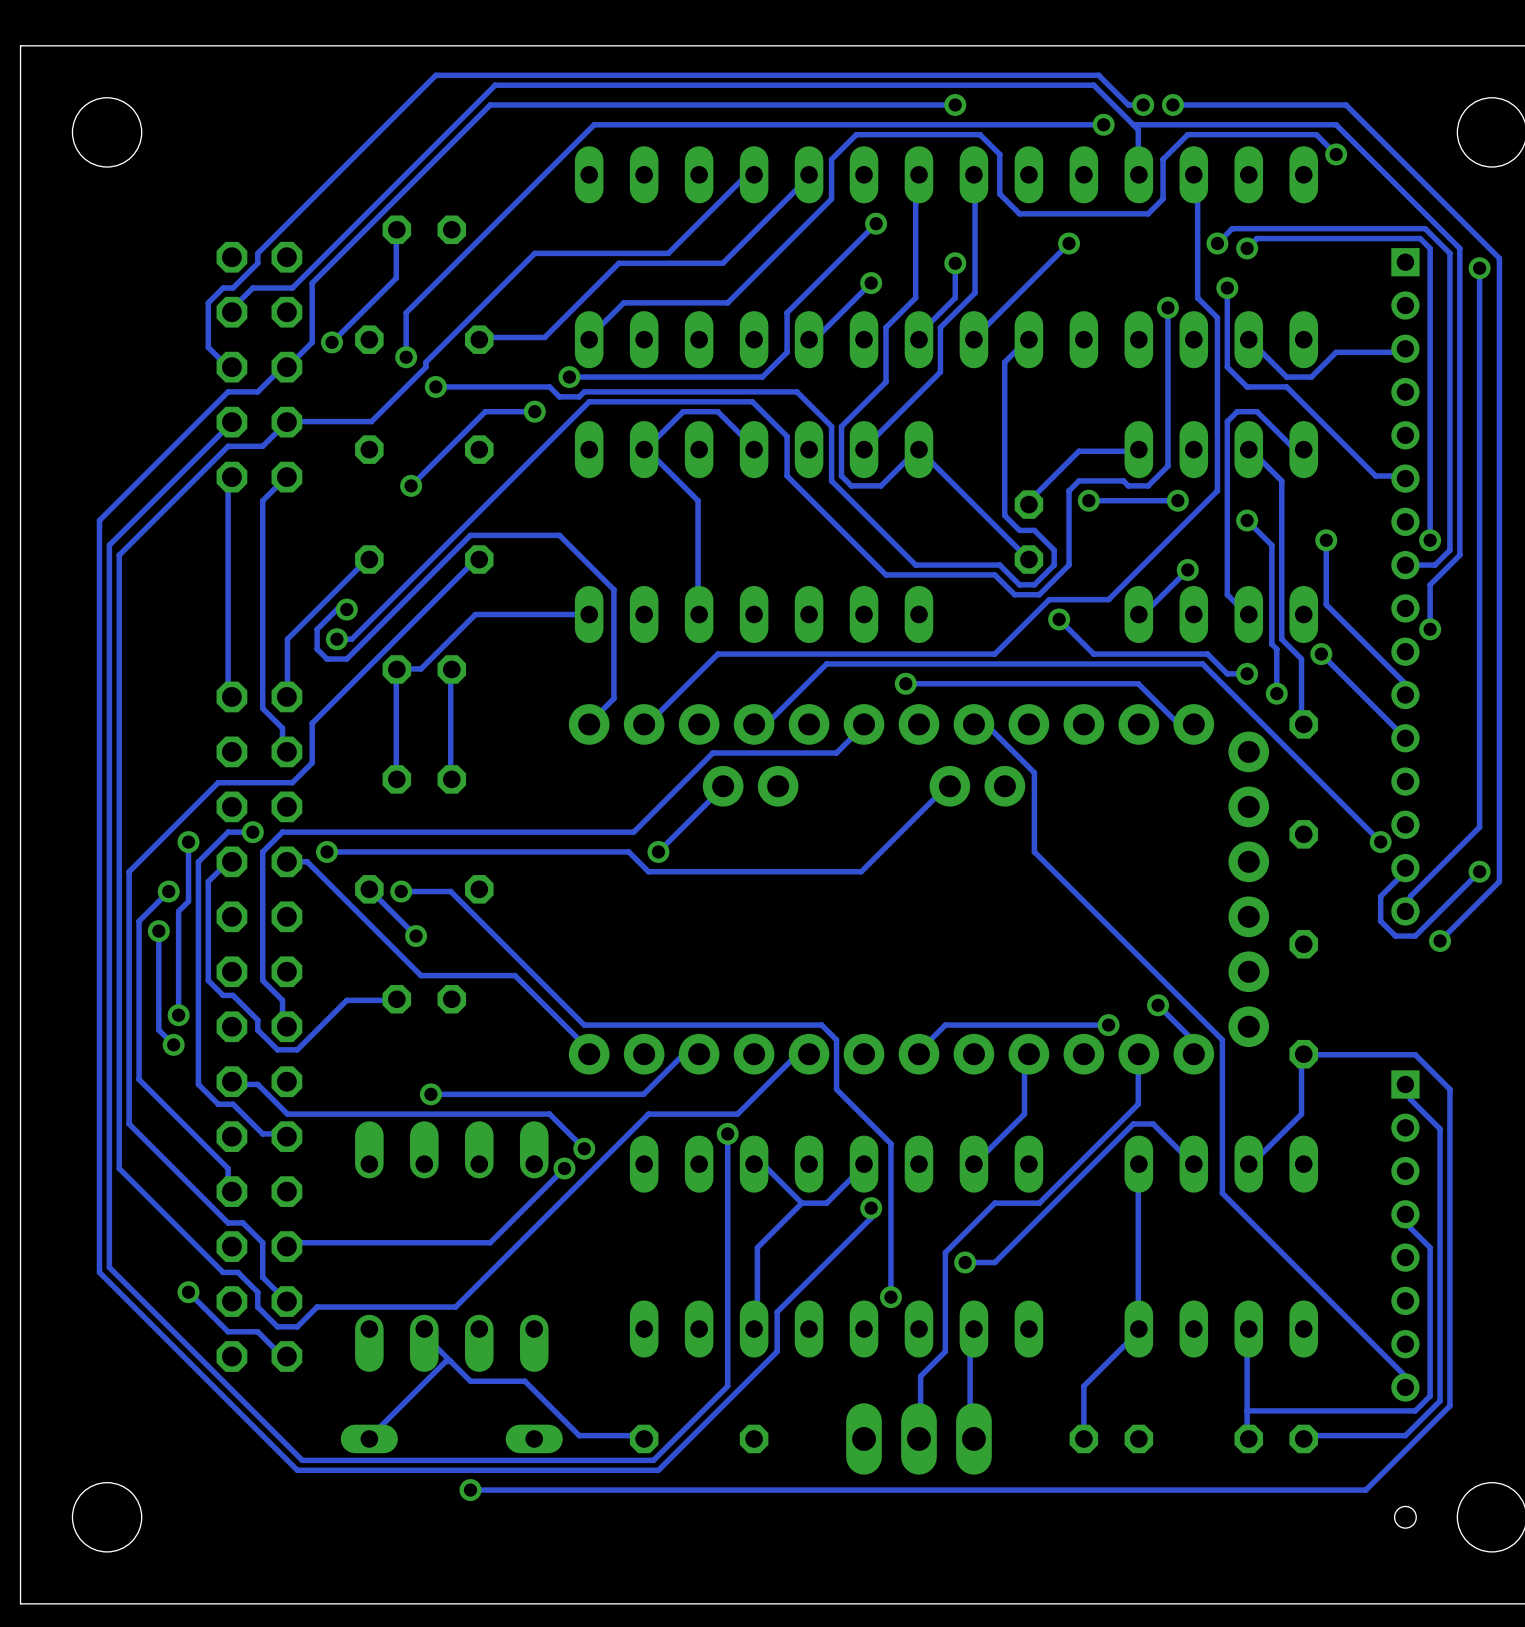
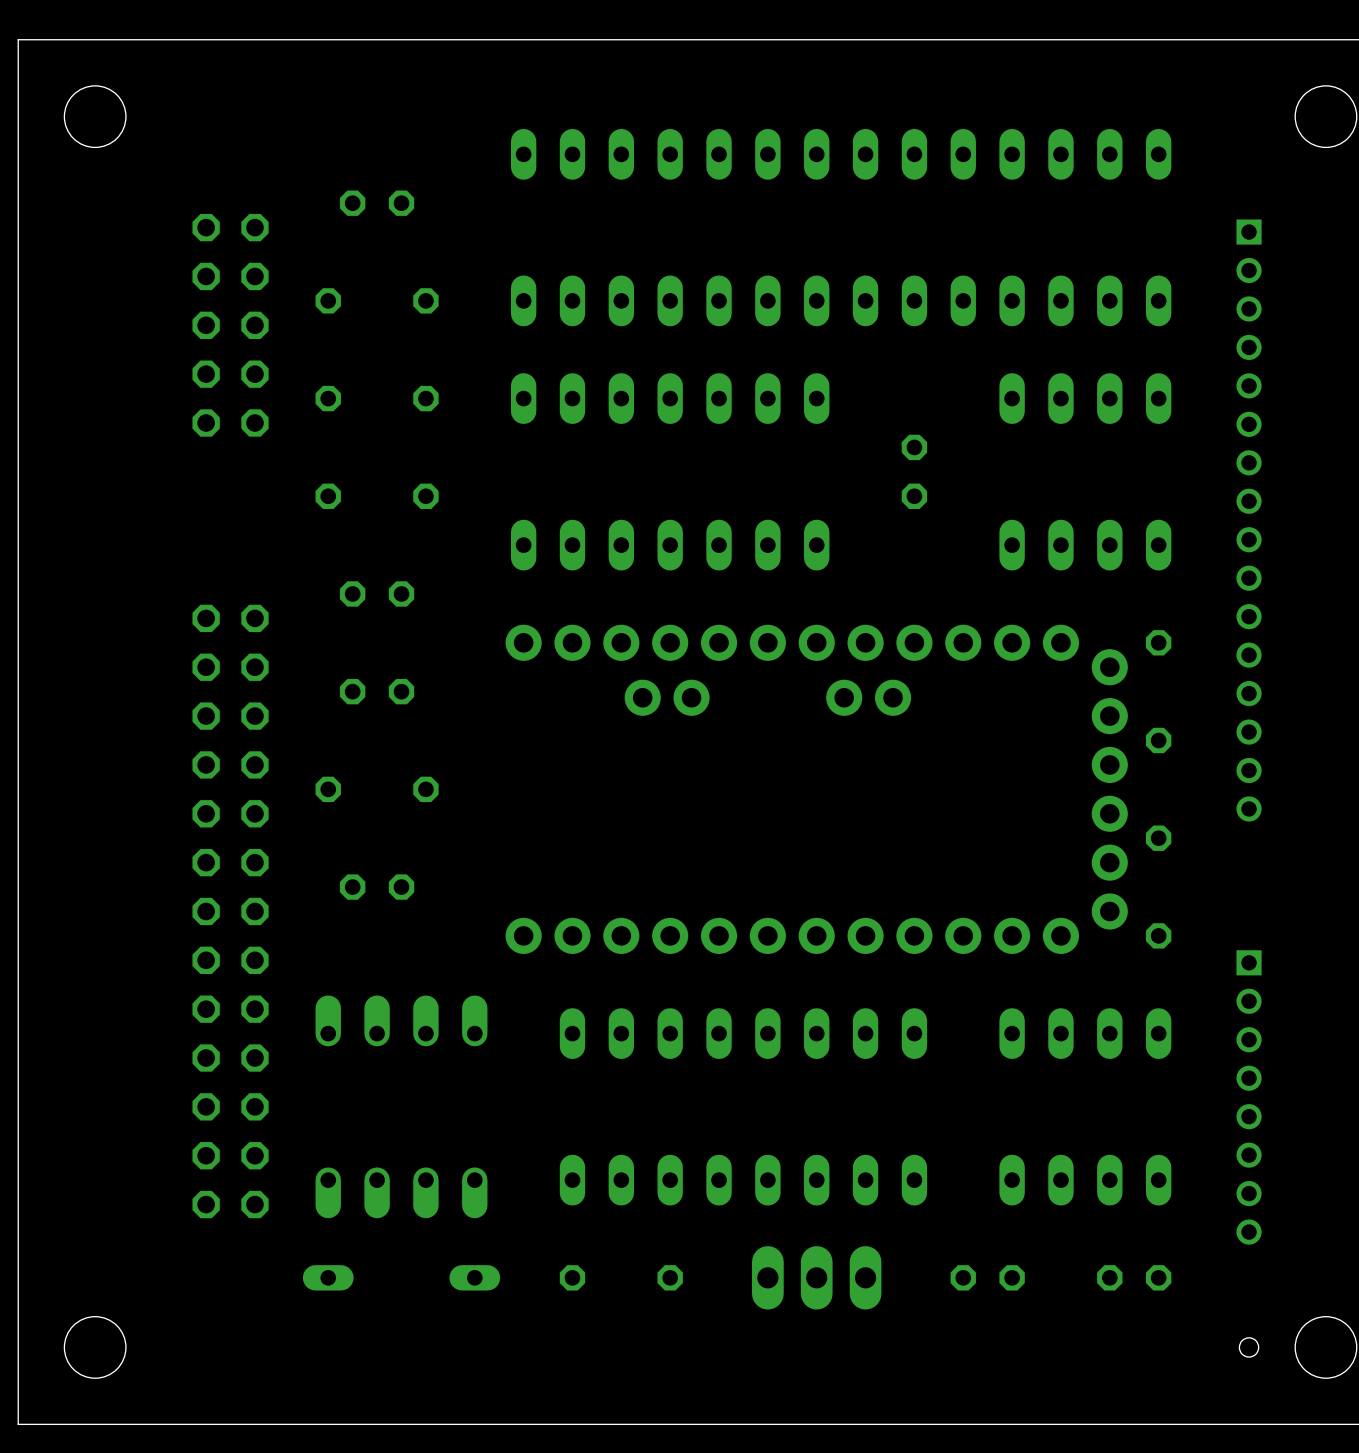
track: (955, 104) (490, 104) (312, 283) (312, 342) (287, 367) (282, 367) (257, 391) (228, 391) (99, 520) (99, 1272) (297, 1470) (658, 1470) (777, 1351) (777, 1311) (871, 1218) (871, 1208) -> none
via: (955, 104) -> none
track: (1143, 104) (1128, 104) (1098, 75) (435, 75) (257, 253) (257, 263) (233, 288) (223, 288) (208, 302) (208, 347) (228, 367) (231, 367) -> none
via: (1143, 104) -> none
track: (1172, 104) (1346, 104) (1499, 258) (1499, 881) (1440, 940) -> none
via: (1172, 104) -> none
track: (1103, 124) (594, 124) (406, 312) (406, 357) -> none
via: (1103, 124) -> none
track: (1133, 124) (1336, 124) (1459, 248) (1459, 555) (1430, 584) (1430, 629) -> none
track: (1336, 154) (1316, 134) (1187, 134) (1163, 159) (1163, 198) (1148, 213) (1019, 213) (999, 194) (999, 154) (980, 134) (856, 134) (831, 159) (831, 198) (727, 302) (623, 302) (589, 337) (589, 339) -> none
via: (1336, 154) -> none
track: (754, 174) (752, 179) (742, 179) (668, 253) (534, 253) (425, 362) (425, 367) (371, 421) (287, 421) (262, 446) (228, 446) (119, 555) (119, 1168) (223, 1272) (237, 1272) (257, 1292) (257, 1307) (277, 1326) (297, 1326) (317, 1307) (455, 1307) (648, 1114) (737, 1114) (796, 1054) (809, 1054) -> none
track: (809, 174) (722, 263) (618, 263) (544, 337) (480, 337) (479, 339) -> none
track: (918, 174) (915, 179) (915, 297) (886, 327) (886, 382) (841, 426) (841, 475) (851, 485) (881, 485) (918, 449) (1028, 559) -> none
track: (973, 174) (975, 292) (940, 327) (940, 372) (864, 449) -> none
track: (1138, 174) (1138, 129) (1093, 85) (495, 85) (292, 288) (252, 288) (233, 307) (231, 312) -> none
track: (1193, 174) (1197, 179) (1197, 297) (1217, 317) (1217, 490) (1108, 599) (1049, 599) (994, 654) (717, 654) (648, 723) (644, 724) -> none
track: (876, 223) (787, 312) (787, 352) (762, 377) (569, 377) -> none
via: (876, 223) -> none
track: (396, 229) (396, 278) (331, 342) -> none
track: (1069, 243) (973, 339) -> none
via: (1069, 243) -> none
track: (1217, 243) (1232, 228) (1425, 228) (1449, 253) (1449, 550) (1435, 565) (1405, 565) -> none
via: (1217, 243) -> none
track: (1247, 248) (1257, 238) (1420, 238) (1430, 248) (1430, 540) -> none
via: (1247, 248) -> none
track: (955, 263) (955, 297) (915, 337) (918, 339) -> none
via: (955, 263) -> none
track: (1479, 268) (1479, 827) (1410, 896) (1410, 911) (1405, 911) -> none
via: (1479, 268) -> none
track: (871, 283) (811, 342) (809, 339) -> none
via: (871, 283) -> none
track: (1227, 288) (1227, 367) (1247, 386) (1286, 386) (1375, 475) (1405, 475) (1405, 478) -> none
via: (1227, 288) -> none
track: (1167, 307) (1167, 466) (1148, 485) (1128, 485) (1123, 480) (1078, 480) (1069, 490) (1069, 565) (1039, 594) (1014, 594) (994, 574) (886, 574) (787, 475) (787, 436) (752, 401) (589, 401) (351, 639) (336, 639) -> none
via: (1167, 307) -> none
track: (1028, 339) (1004, 362) (1004, 515) (1019, 530) (1034, 530) (1054, 550) (1054, 565) (1034, 584) (1019, 584) (999, 565) (915, 565) (831, 480) (831, 426) (796, 391) (584, 391) (579, 396) (559, 396) (549, 386) (435, 386) -> none
track: (1248, 339) (1286, 377) (1311, 377) (1336, 352) (1405, 352) (1405, 348) -> none
via: (331, 342) -> none
via: (406, 357) -> none
via: (569, 377) -> none
via: (435, 386) -> none
track: (534, 411) (485, 411) (411, 485) -> none
via: (534, 411) -> none
track: (231, 422) (109, 545) (109, 1267) (302, 1460) (653, 1460) (727, 1386) (727, 1133) -> none
track: (754, 449) (717, 411) (683, 411) (644, 449) (648, 451) (698, 500) (699, 614) -> none
track: (1138, 449) (1138, 451) (1078, 451) (1029, 500) (1028, 504) -> none
track: (1248, 449) (1281, 480) (1281, 639) (1301, 659) (1301, 723) (1303, 724) -> none
track: (1303, 449) (1301, 446) (1291, 446) (1257, 411) (1237, 411) (1227, 421) (1227, 594) (1248, 614) -> none
track: (231, 477) (228, 480) (228, 693) (231, 696) -> none
track: (286, 477) (262, 500) (262, 708) (282, 728) (282, 748) (286, 751) -> none
via: (411, 485) -> none
via: (1088, 500) -> none
track: (1177, 500) (1088, 500) -> none
via: (1177, 500) -> none
track: (1247, 520) (1271, 545) (1271, 644) (1276, 649) (1276, 693) -> none
via: (1247, 520) -> none
track: (1326, 540) (1326, 604) (1405, 683) (1405, 695) -> none
via: (1326, 540) -> none
via: (1430, 540) -> none
track: (369, 559) (366, 560) (287, 639) (286, 696) -> none
track: (479, 559) (475, 560) (312, 723) (312, 762) (292, 782) (218, 782) (129, 871) (129, 1124) (228, 1222) (242, 1222) (262, 1242) (262, 1277) (286, 1301) -> none
track: (1187, 569) (1143, 614) (1138, 614) -> none
via: (1187, 569) -> none
track: (346, 609) (336, 609) (317, 629) (317, 649) (327, 659) (346, 659) (470, 535) (559, 535) (613, 589) (613, 698) (589, 724) -> none
via: (346, 609) -> none
track: (589, 614) (475, 614) (421, 668) (396, 669) (396, 779) -> none
track: (1059, 619) (1093, 654) (1207, 654) (1227, 673) (1247, 673) -> none
via: (1059, 619) -> none
via: (1430, 629) -> none
via: (336, 639) -> none
track: (1321, 654) (1405, 738) -> none
via: (1321, 654) -> none
track: (451, 669) (451, 779) -> none
via: (1247, 673) -> none
track: (905, 683) (1138, 683) (1177, 723) (1193, 724) -> none
via: (905, 683) -> none
via: (1276, 693) -> none
track: (754, 724) (767, 723) (826, 663) (1202, 663) (1380, 842) -> none
track: (864, 724) (836, 753) (712, 753) (633, 832) (282, 832) (262, 851) (262, 980) (282, 1000) (282, 1025) (286, 1026) -> none
track: (973, 724) (975, 728) (989, 728) (1034, 772) (1034, 851) (1222, 1039) (1222, 1193) (1405, 1376) (1405, 1387) -> none
track: (723, 786) (658, 851) -> none
track: (949, 786) (945, 787) (861, 871) (648, 871) (628, 851) (327, 851) -> none
track: (252, 832) (228, 832) (198, 861) (198, 1084) (218, 1104) (233, 1104) (262, 1133) (282, 1133) (286, 1136) -> none
via: (252, 832) -> none
track: (188, 842) (188, 901) (178, 911) (178, 1015) -> none
via: (188, 842) -> none
via: (1380, 842) -> none
via: (327, 851) -> none
via: (658, 851) -> none
track: (231, 861) (228, 861) (208, 881) (208, 980) (223, 995) (233, 995) (257, 1020) (257, 1030) (277, 1049) (297, 1049) (346, 1000) (396, 999) -> none
track: (286, 861) (307, 861) (421, 975) (515, 975) (589, 1049) (589, 1054) -> none
track: (1405, 868) (1405, 871) (1380, 896) (1380, 921) (1395, 936) (1415, 936) (1479, 871) -> none
via: (1479, 871) -> none
track: (369, 889) (416, 936) -> none
track: (168, 891) (139, 921) (139, 1079) (228, 1168) (228, 1188) (231, 1191) -> none
via: (168, 891) -> none
track: (401, 891) (450, 891) (584, 1025) (821, 1025) (836, 1039) (836, 1089) (890, 1143) (890, 1297) -> none
via: (401, 891) -> none
track: (158, 931) (158, 1030) (173, 1044) -> none
via: (158, 931) -> none
via: (416, 936) -> none
via: (1440, 940) -> none
track: (1158, 1005) (1192, 1039) (1193, 1054) -> none
via: (1158, 1005) -> none
via: (178, 1015) -> none
track: (1108, 1025) (945, 1025) (920, 1049) (918, 1054) -> none
via: (1108, 1025) -> none
via: (173, 1044) -> none
track: (699, 1054) (683, 1054) (643, 1094) (430, 1094) -> none
track: (1028, 1054) (1024, 1054) (1024, 1114) (973, 1164) -> none
track: (1138, 1054) (1138, 1104) (1039, 1203) (994, 1203) (945, 1252) (945, 1351) (920, 1376) (920, 1435) (918, 1438) -> none
track: (231, 1081) (233, 1084) (257, 1084) (287, 1114) (549, 1114) (584, 1148) -> none
track: (1405, 1084) (1410, 1089) (1410, 1099) (1440, 1128) (1440, 1401) (1405, 1435) (1306, 1435) (1303, 1438) -> none
via: (430, 1094) -> none
via: (727, 1133) -> none
via: (584, 1148) -> none
track: (754, 1164) (757, 1168) (767, 1168) (801, 1203) -> none
track: (864, 1164) (826, 1203) (801, 1203) -> none
track: (1138, 1164) (1138, 1329) (1138, 1331) (1083, 1386) (1083, 1438) -> none
track: (1193, 1164) (1153, 1124) (1133, 1124) (994, 1262) (965, 1262) -> none
track: (1248, 1164) (1252, 1163) (1301, 1114) (1301, 1054) (1415, 1054) (1449, 1089) (1449, 1405) (1365, 1490) (470, 1490) -> none
track: (564, 1168) (490, 1242) (287, 1242) (286, 1246) -> none
via: (564, 1168) -> none
track: (801, 1203) (757, 1247) (757, 1326) (754, 1329) -> none
via: (871, 1208) -> none
track: (1405, 1214) (1410, 1218) (1410, 1227) (1430, 1247) (1430, 1396) (1415, 1410) (1247, 1410) -> none
via: (965, 1262) -> none
track: (188, 1292) (228, 1331) (257, 1331) (282, 1356) (286, 1356) -> none
via: (188, 1292) -> none
via: (890, 1297) -> none
track: (424, 1329) (421, 1331) (470, 1381) (524, 1381) (579, 1435) (643, 1435) (644, 1438) -> none
track: (973, 1329) (970, 1331) (970, 1435) (973, 1438) -> none
track: (1248, 1329) (1247, 1331) (1247, 1435) (1248, 1438) -> none
track: (450, 1361) (445, 1361) (369, 1438) -> none
via: (470, 1490) -> none

